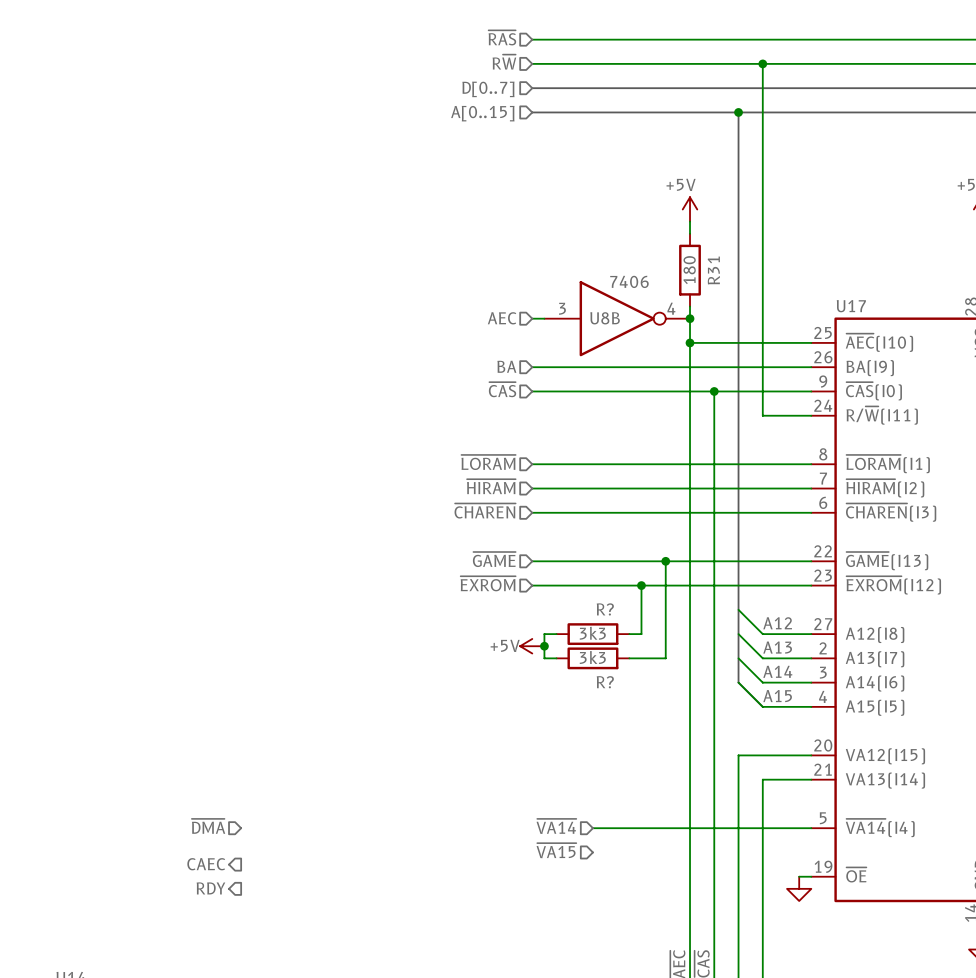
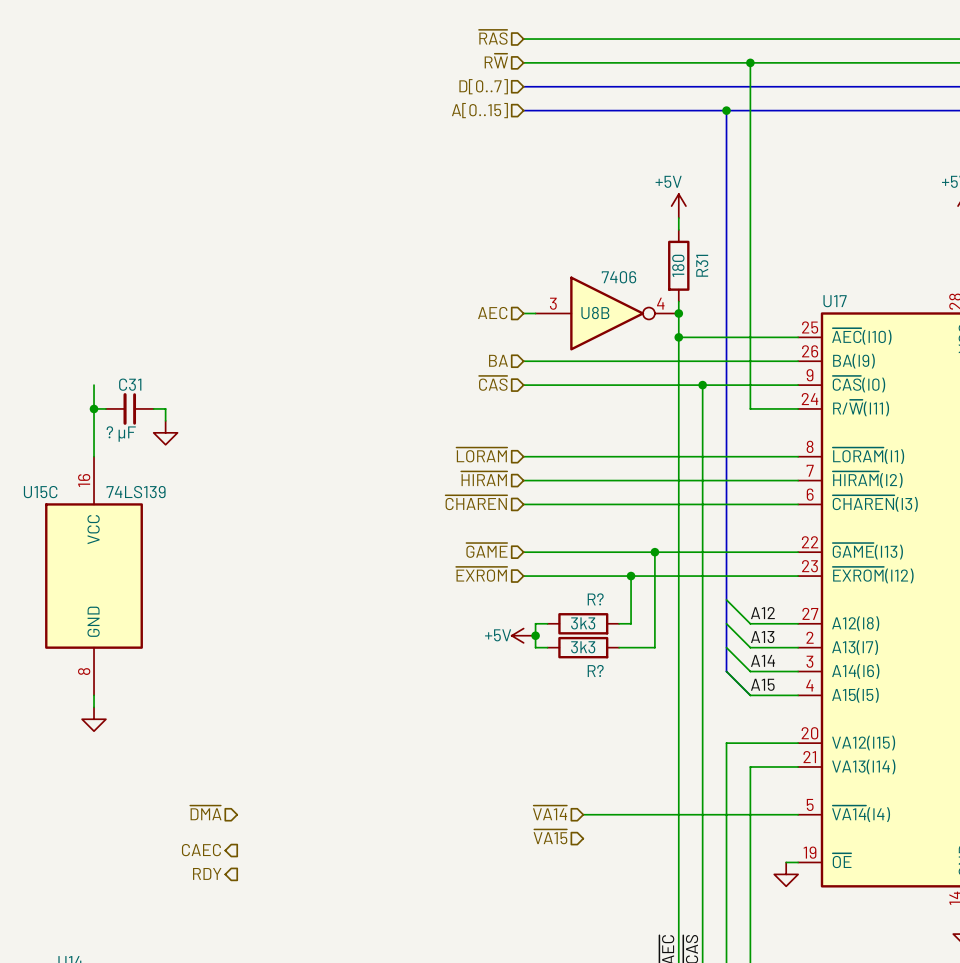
wire: none -> (94, 385) (94, 456)
wire: none -> (94, 408) (105, 408)
junction: none -> (94, 408)
C31: none -> ? μF (129, 408)
wire: none -> (153, 408) (165, 408) (165, 420)
power symbol: none -> (165, 432)
U15C: none -> 74LS139 (94, 576)
wire: none -> (94, 695) (94, 707)
power symbol: none -> (94, 719)

